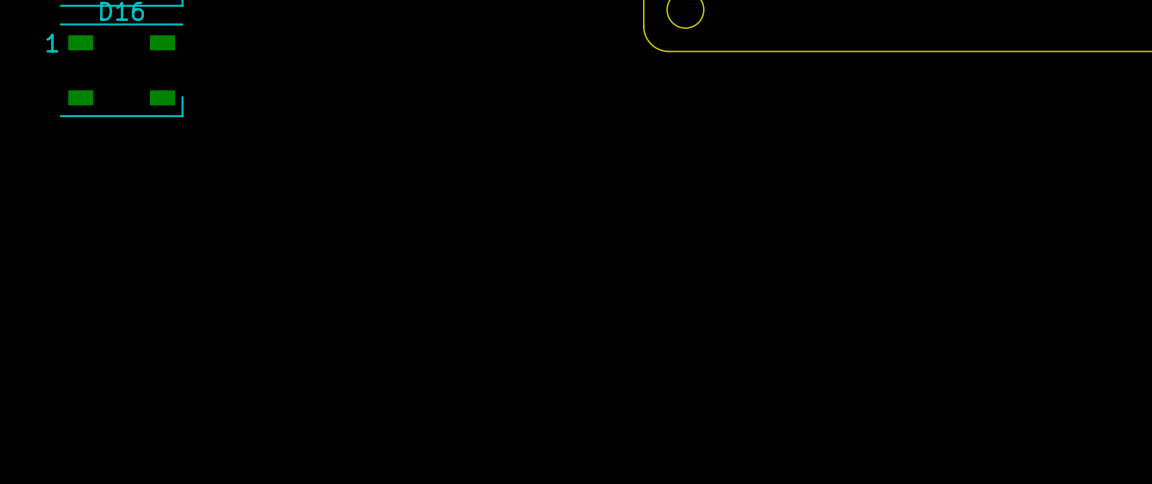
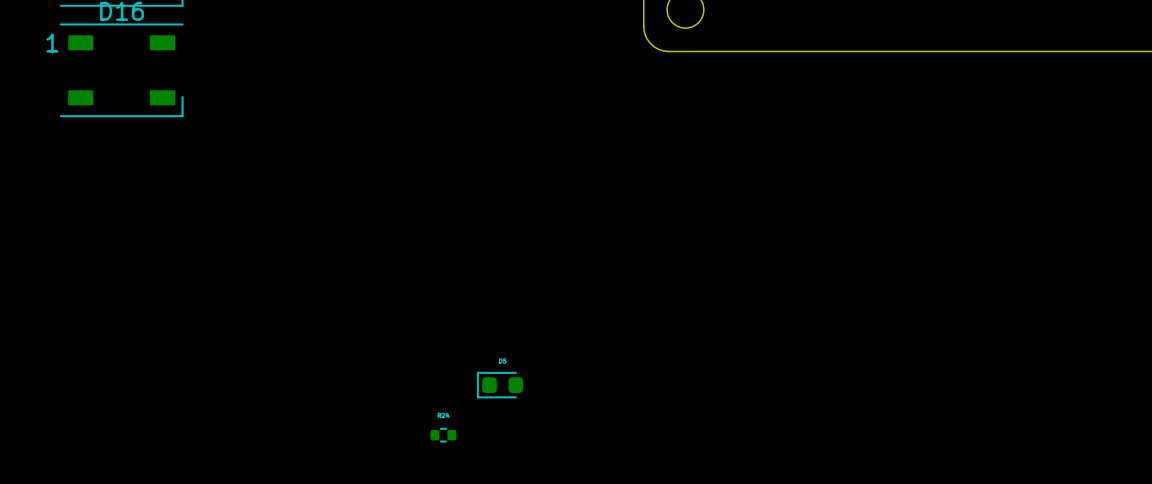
part: none -> (499, 385)
part: none -> (443, 435)

